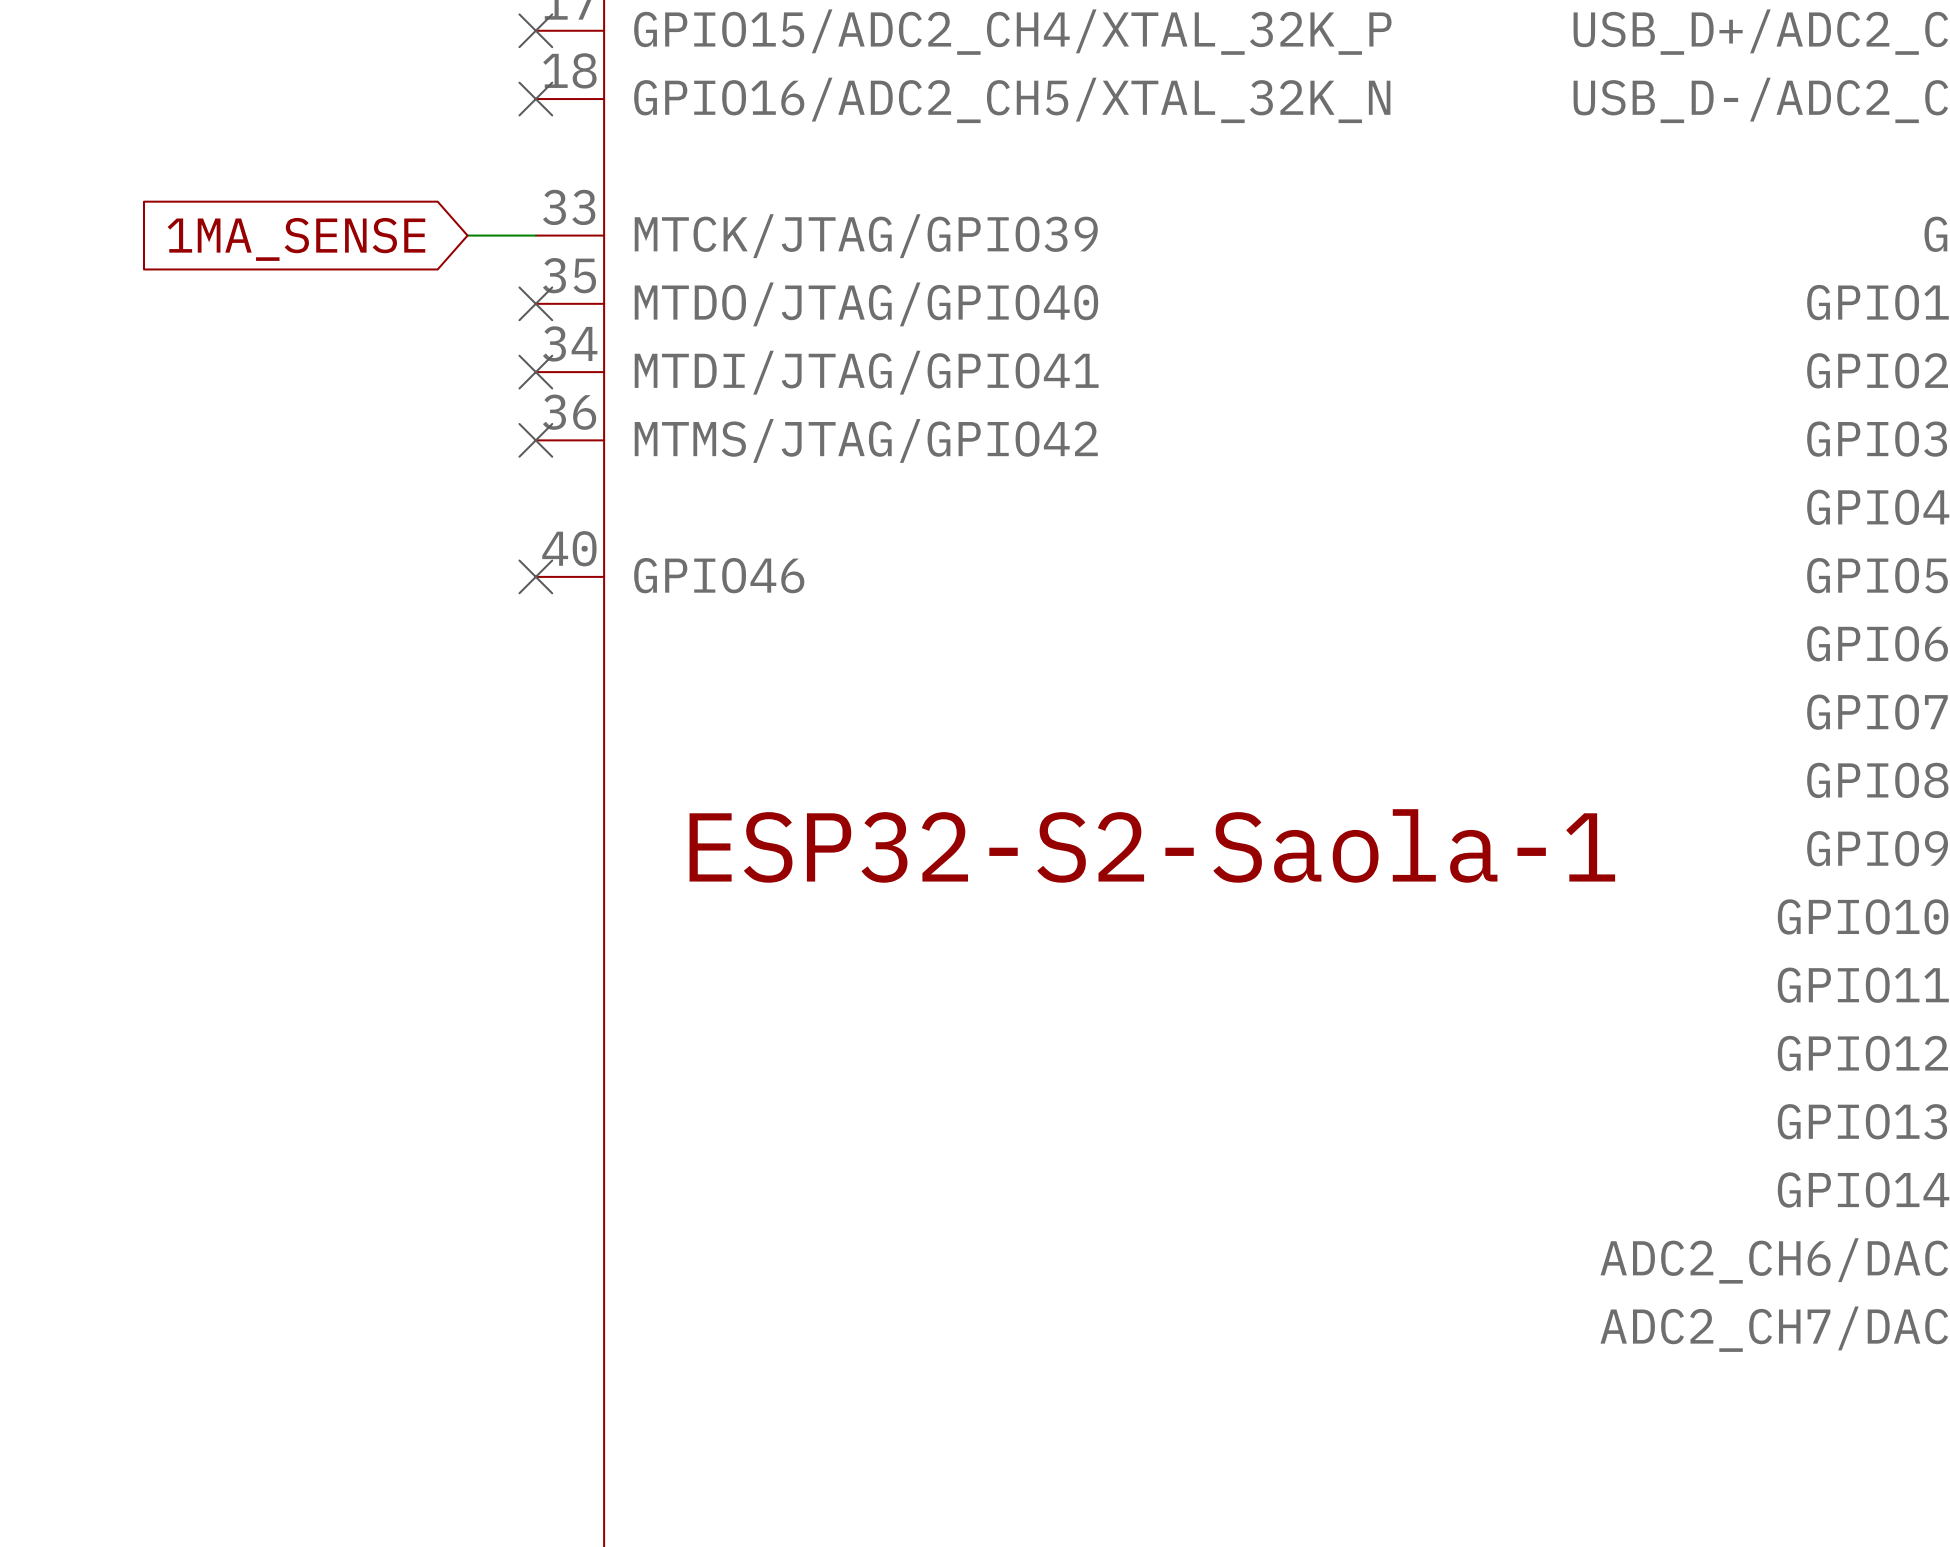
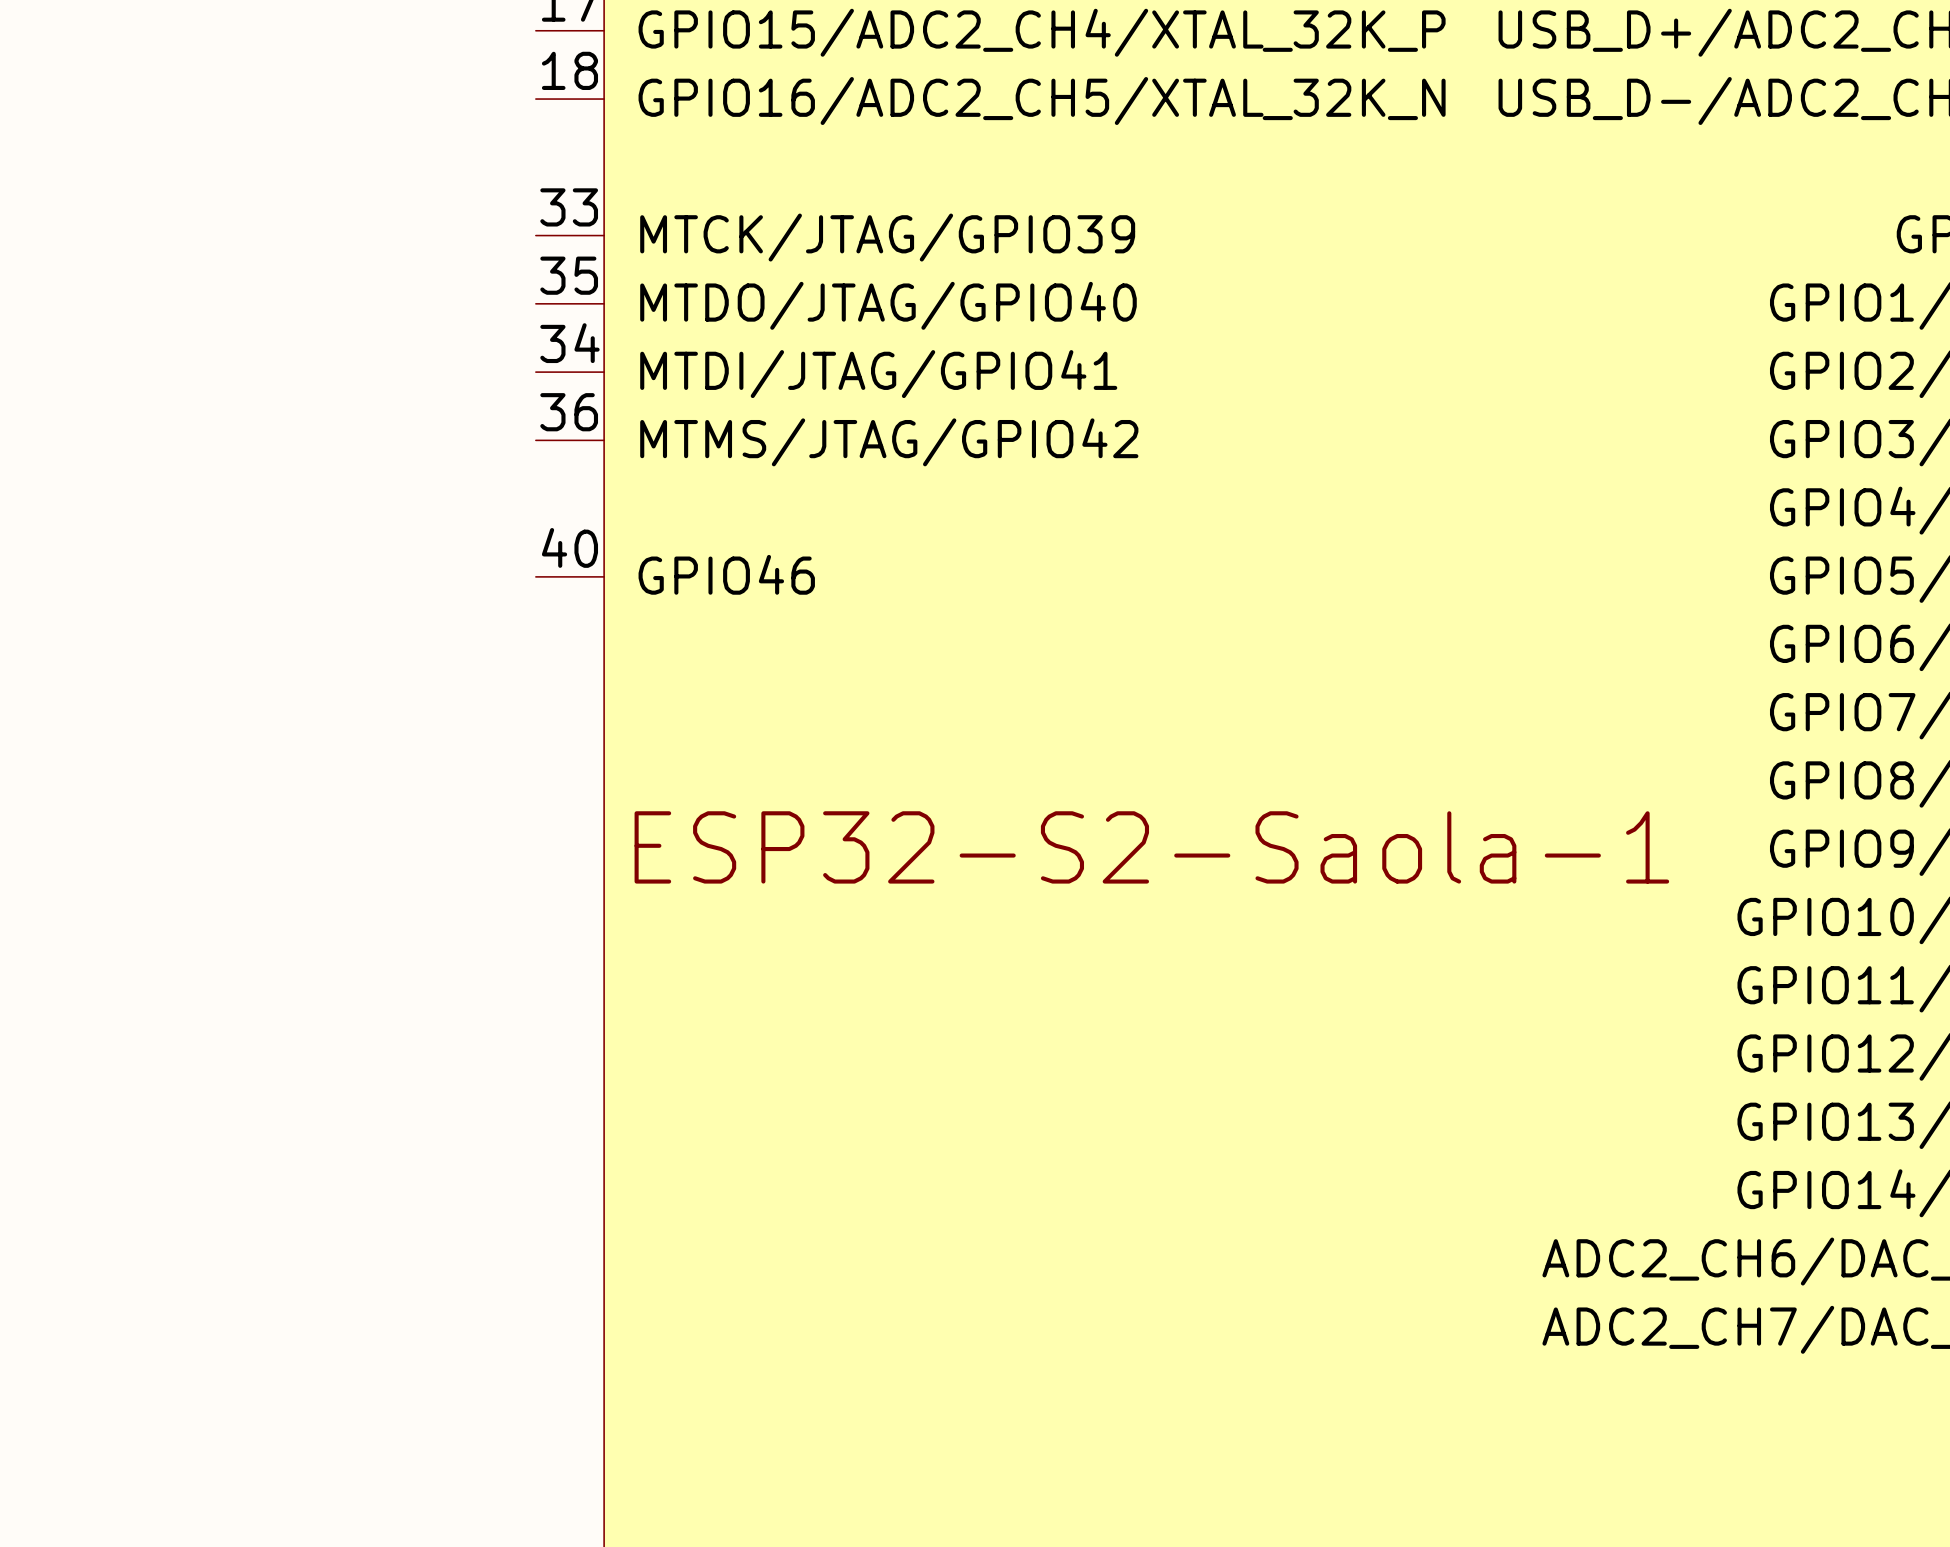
no-connect mark: (535, 30) -> none
no-connect mark: (535, 99) -> none
wire: (467, 235) (535, 235) -> none
global label: 1MA_SENSE (296, 239) -> none
no-connect mark: (535, 303) -> none
no-connect mark: (535, 372) -> none
no-connect mark: (535, 440) -> none
no-connect mark: (535, 576) -> none

